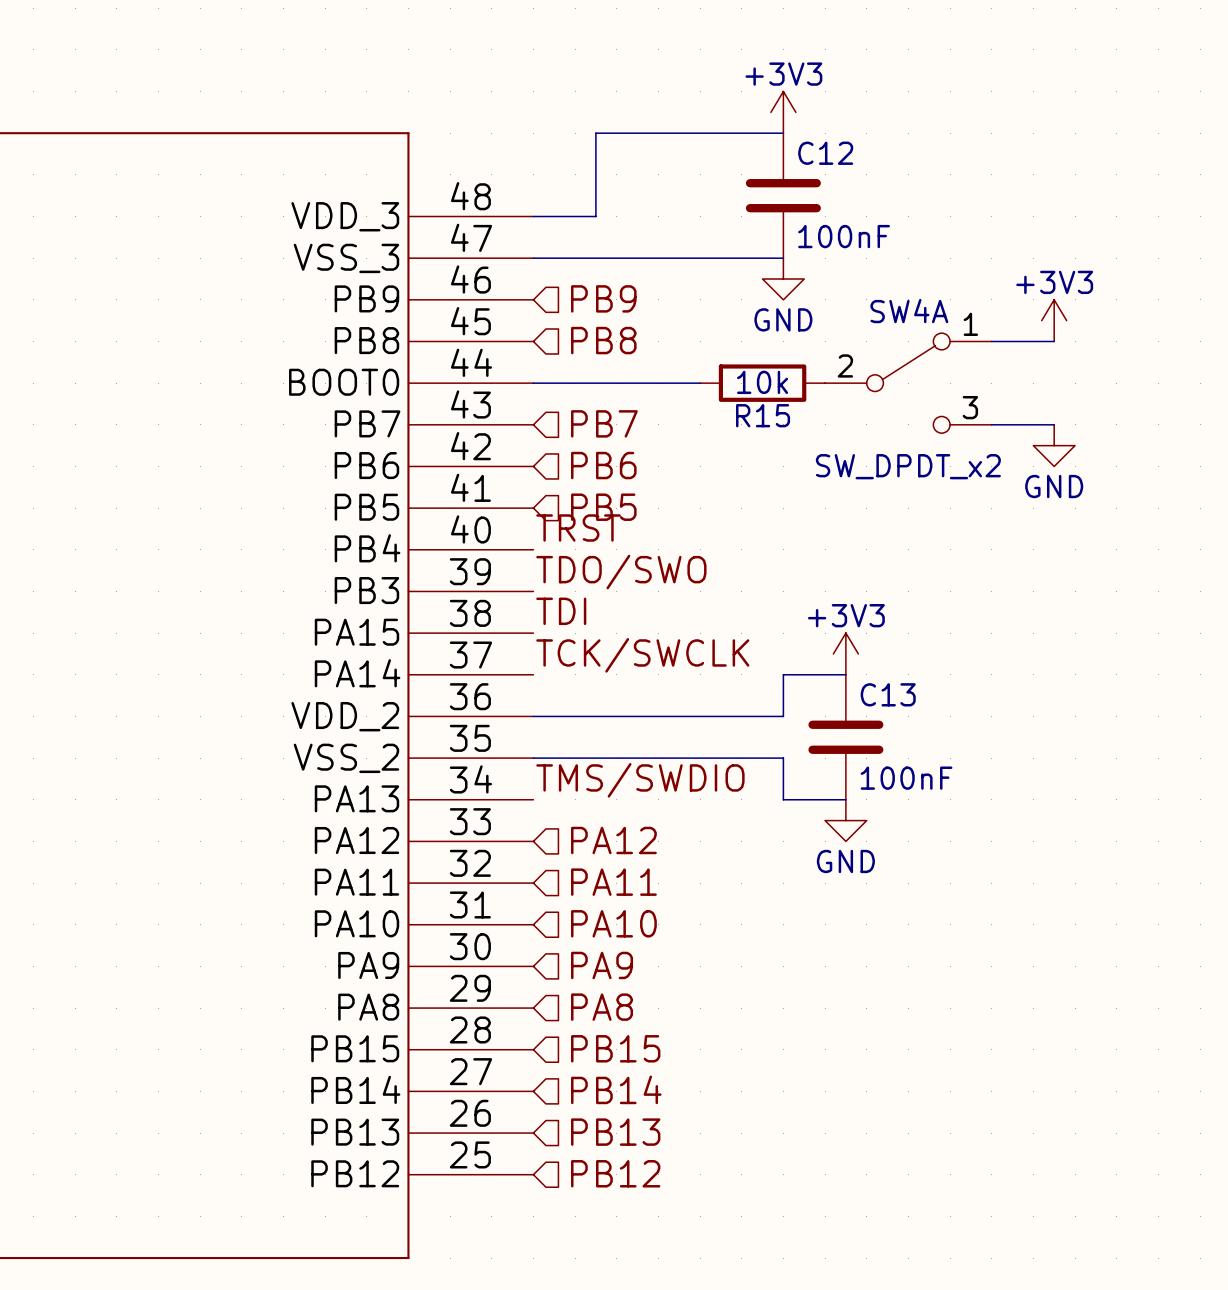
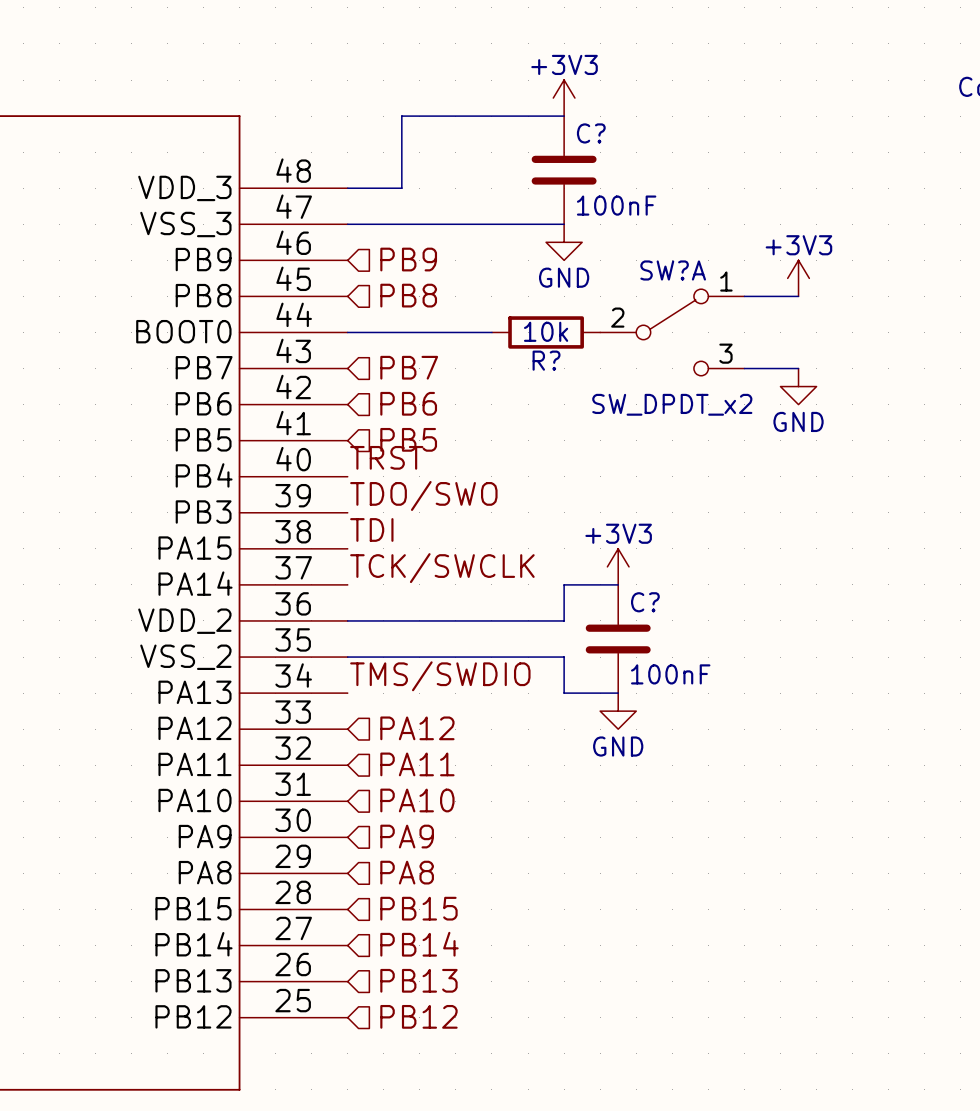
C12 name: C12 (825, 153) -> C? (591, 133)
SW4A name: SW4A (909, 311) -> SW?A (673, 270)
R15 name: R15 (763, 415) -> R? (546, 360)
C13 name: C13 (888, 694) -> C? (645, 602)

